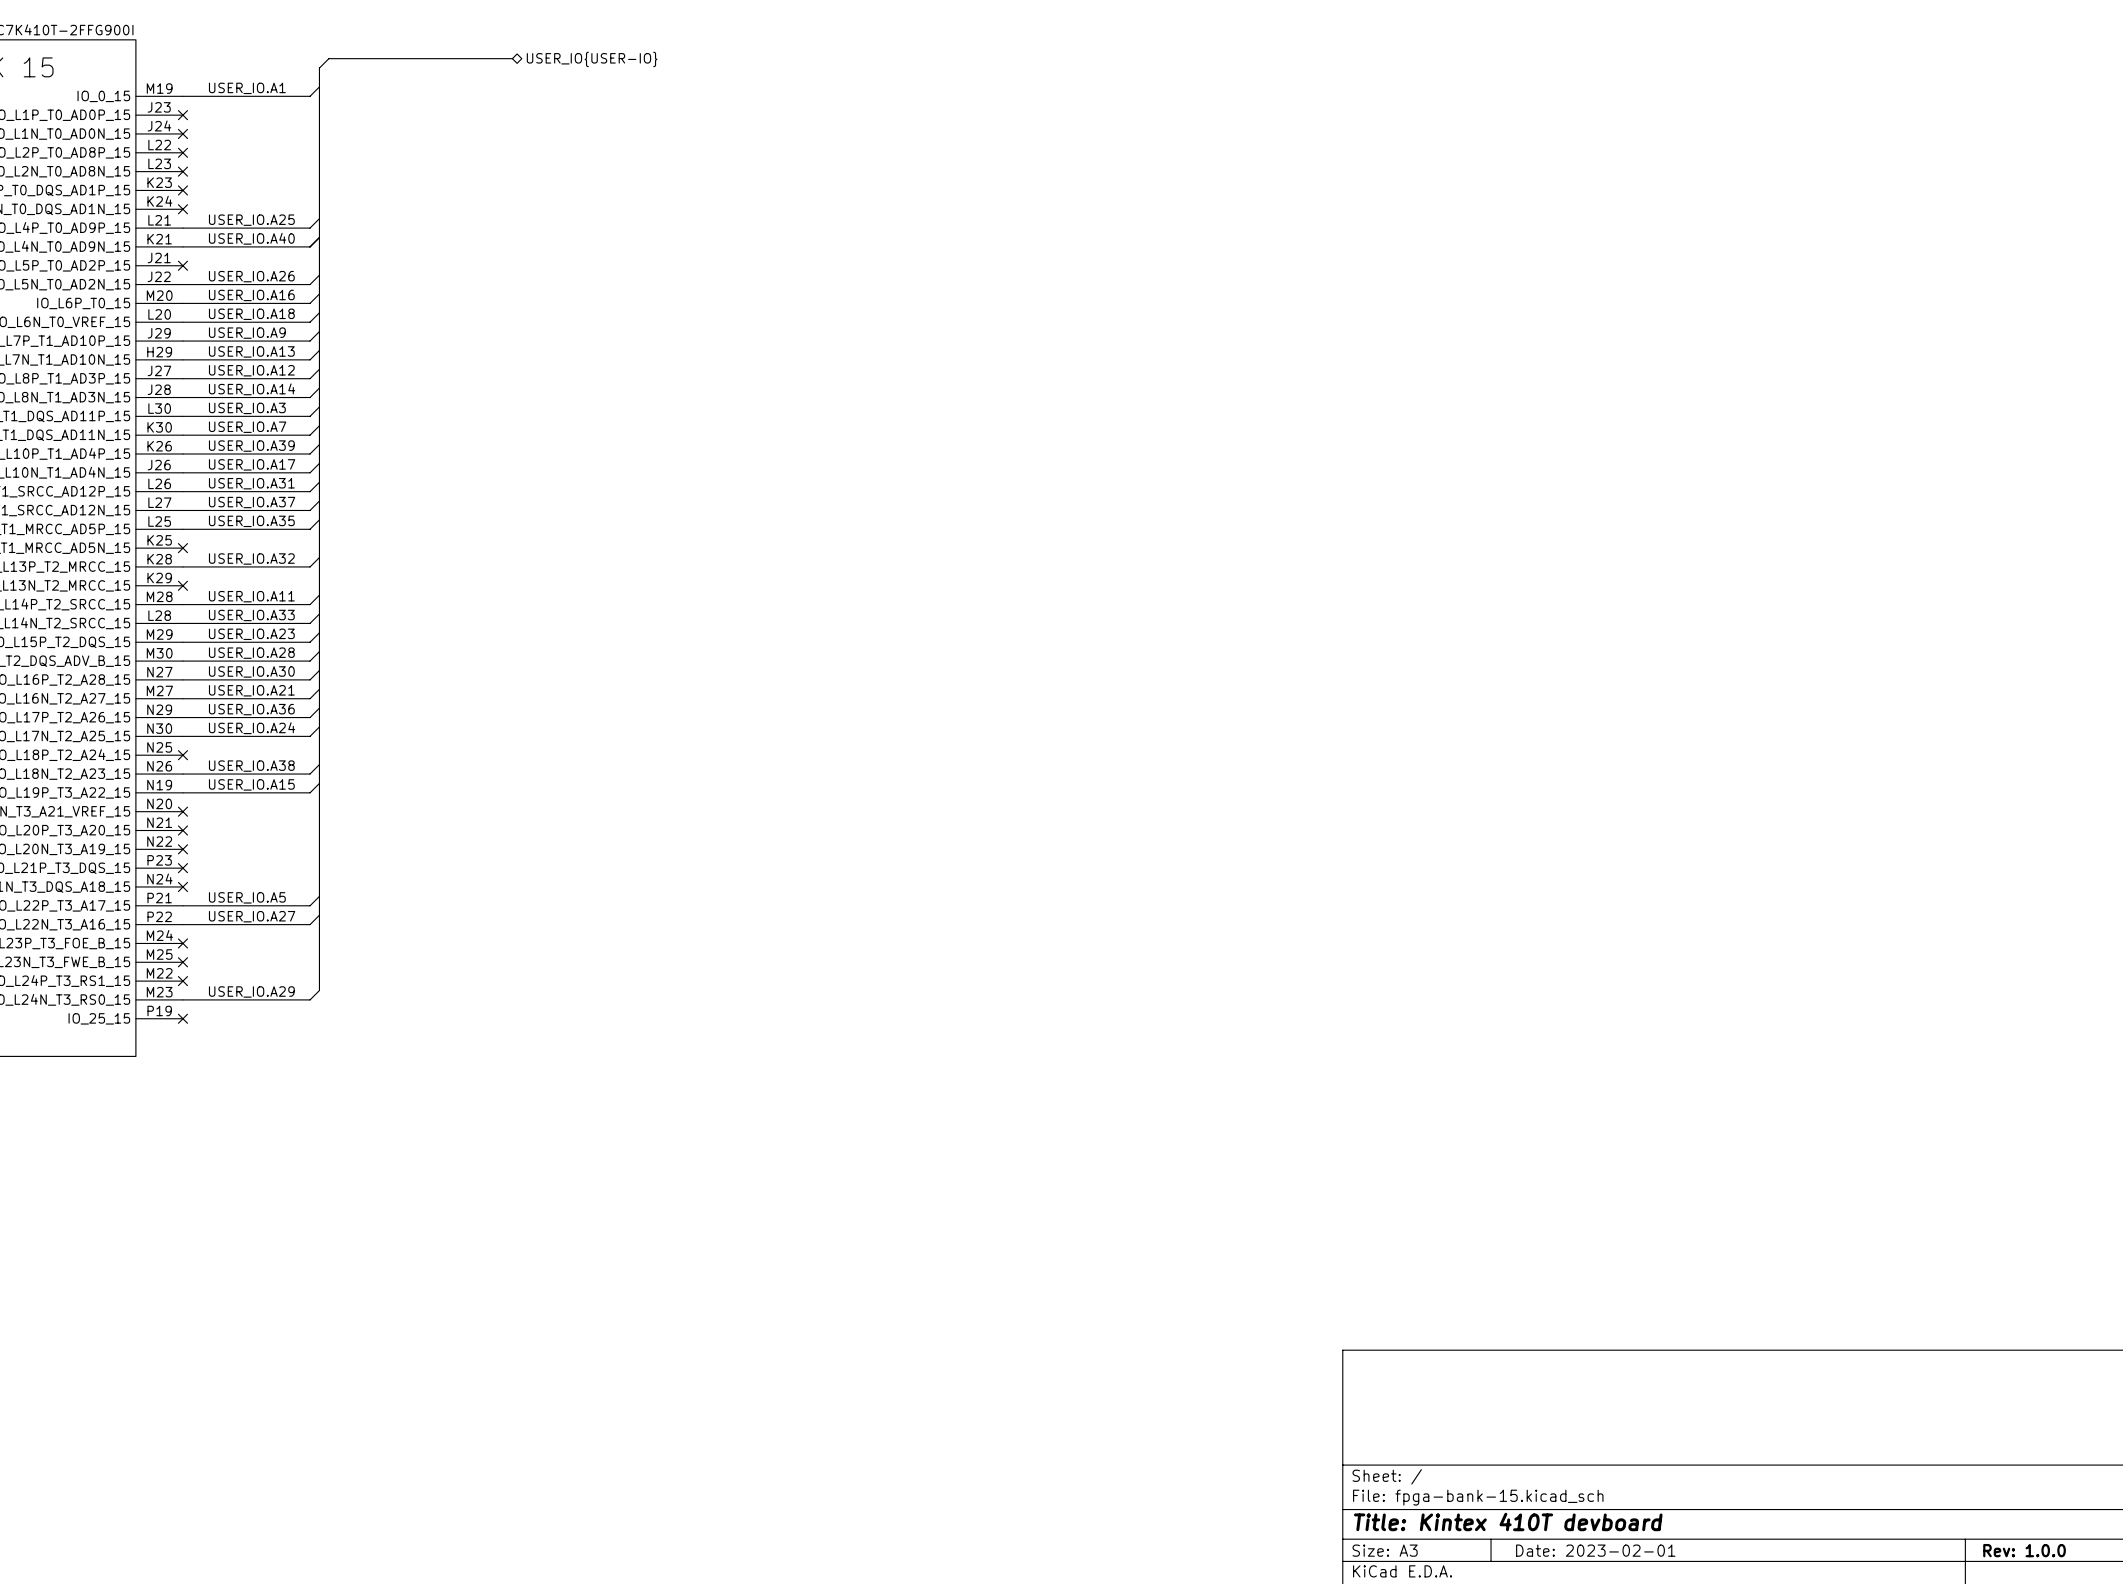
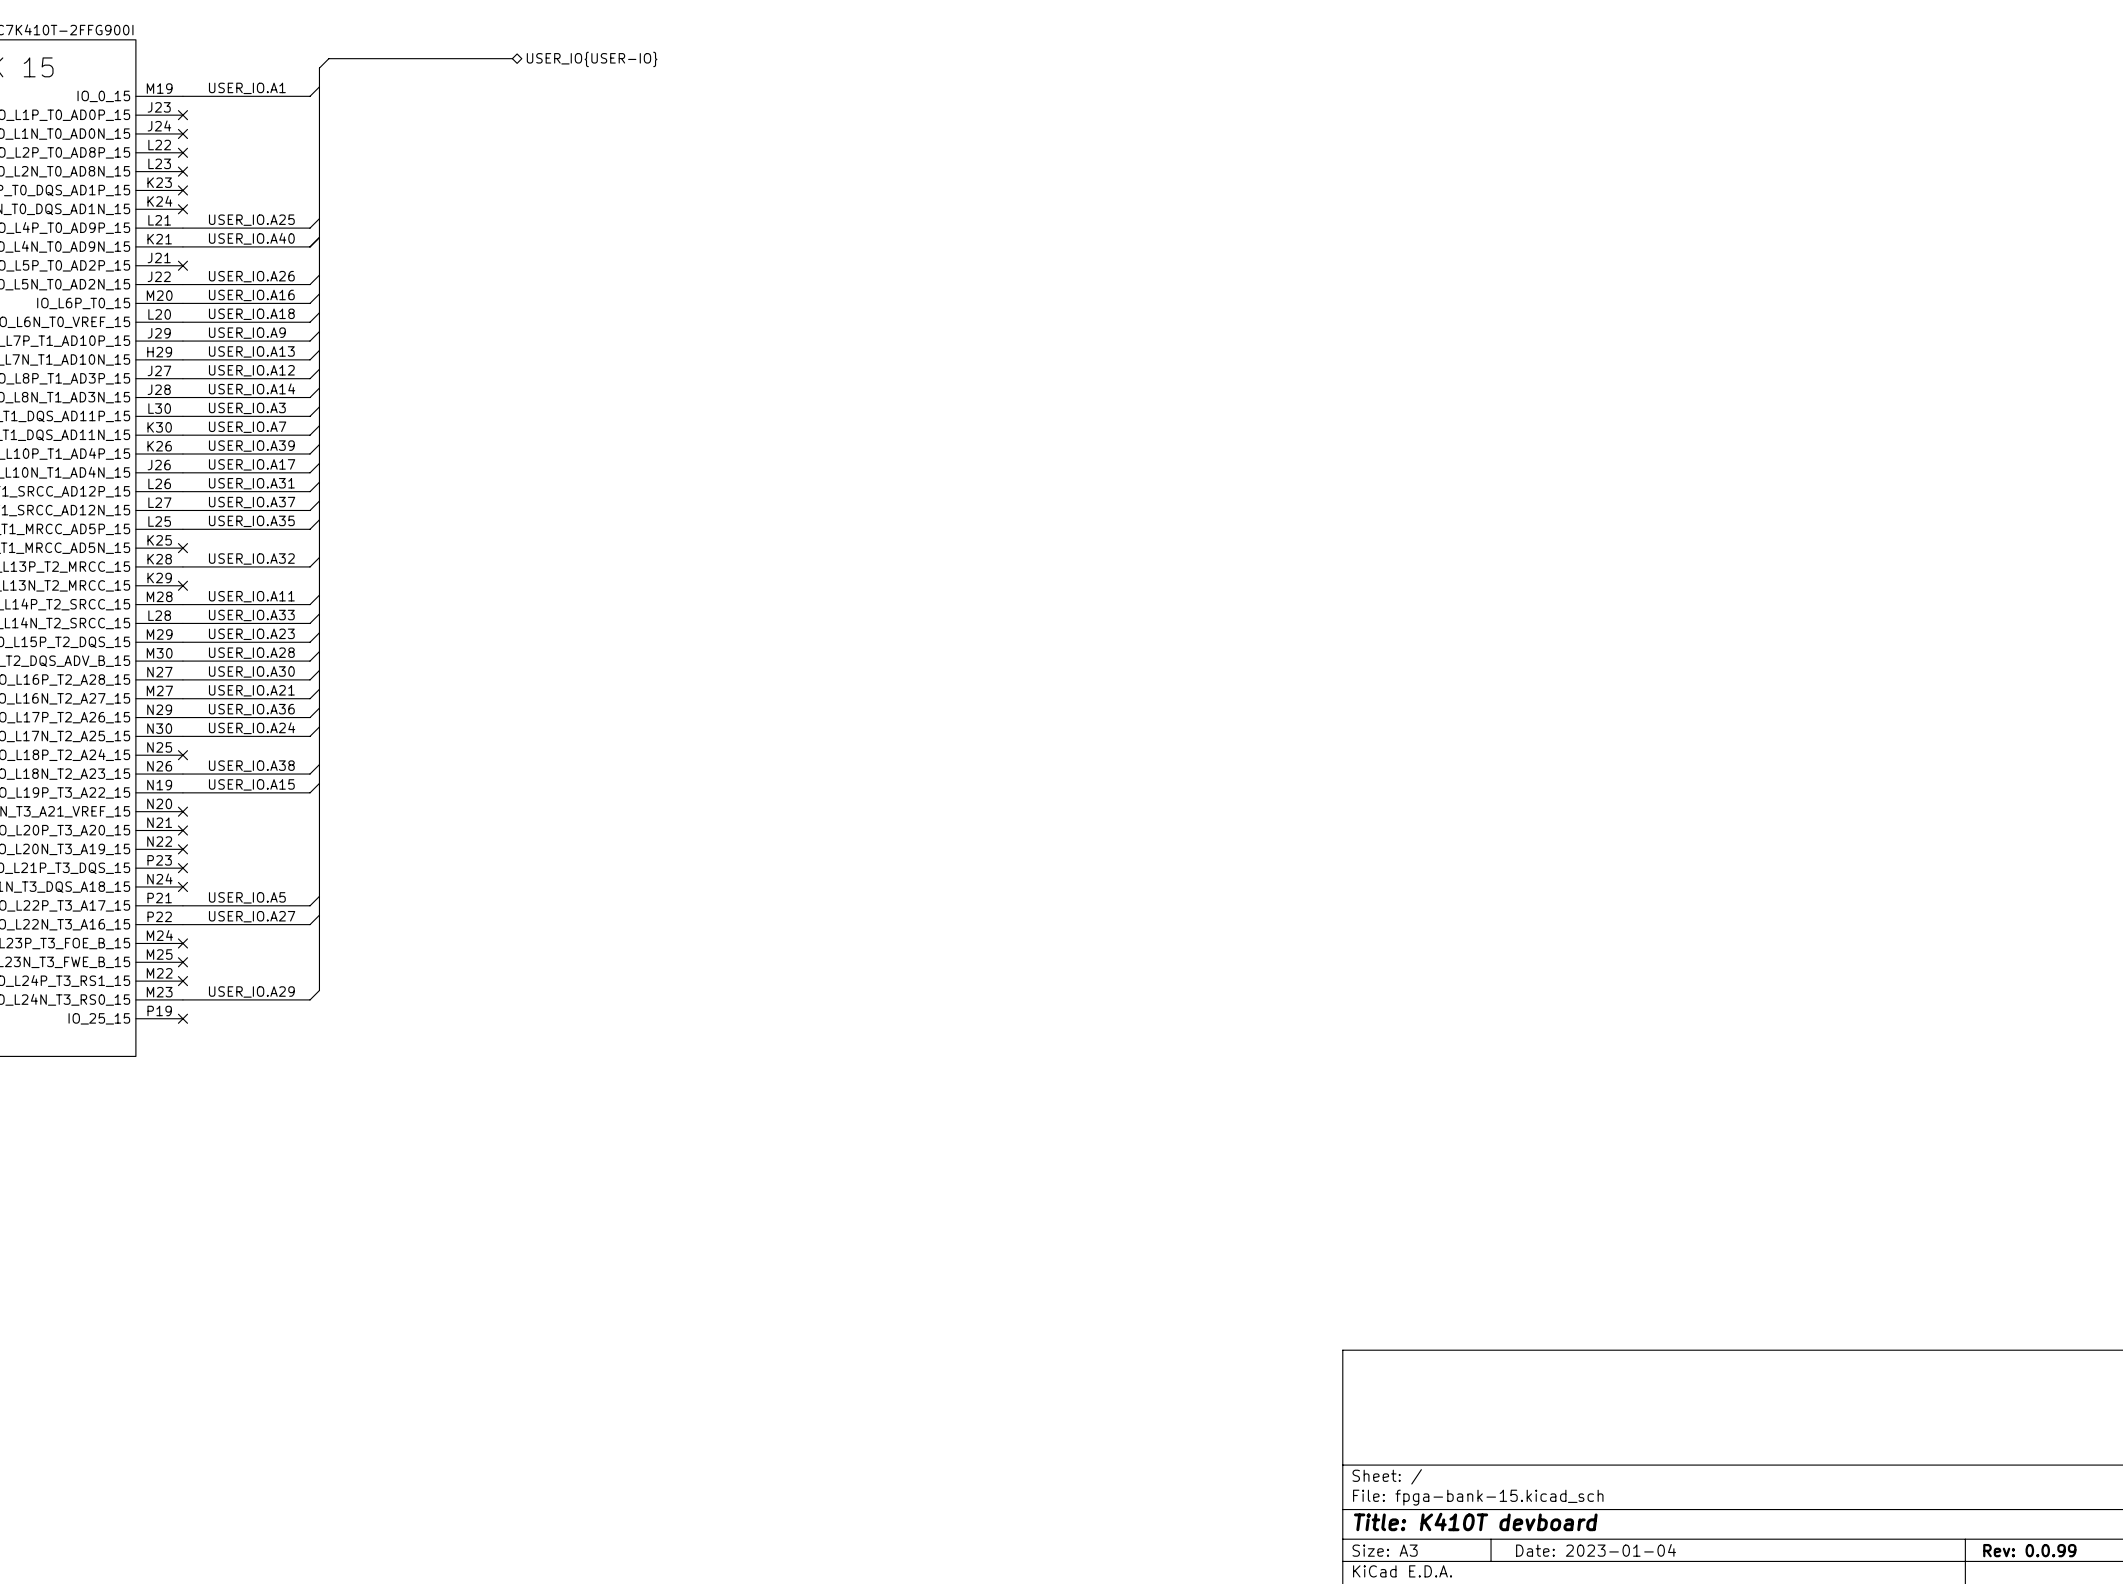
title block: Title: Kintex 410T devboard (1508, 1521) -> Title: K410T devboard (1475, 1521)
title block: Date: 2023-02-01 (1595, 1550) -> Date: 2023-01-04 (1596, 1550)
title block: Rev: 1.0.0 (2024, 1550) -> Rev: 0.0.99 (2029, 1550)

